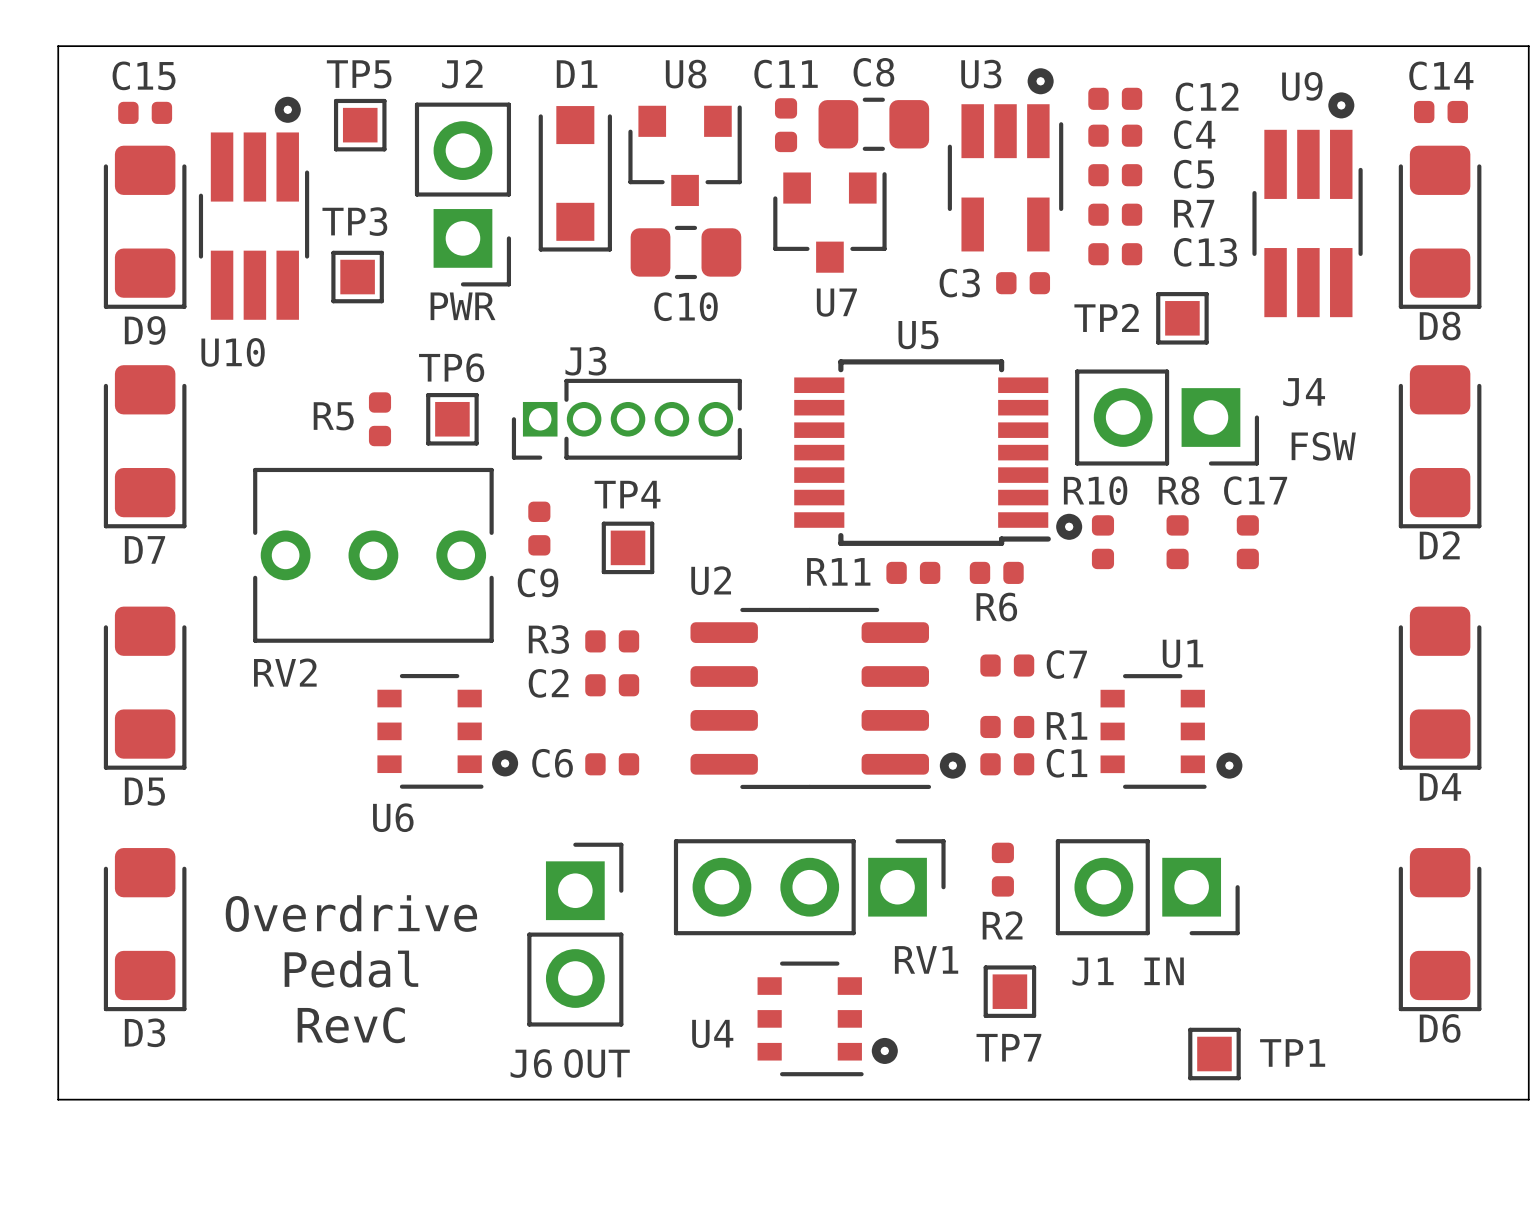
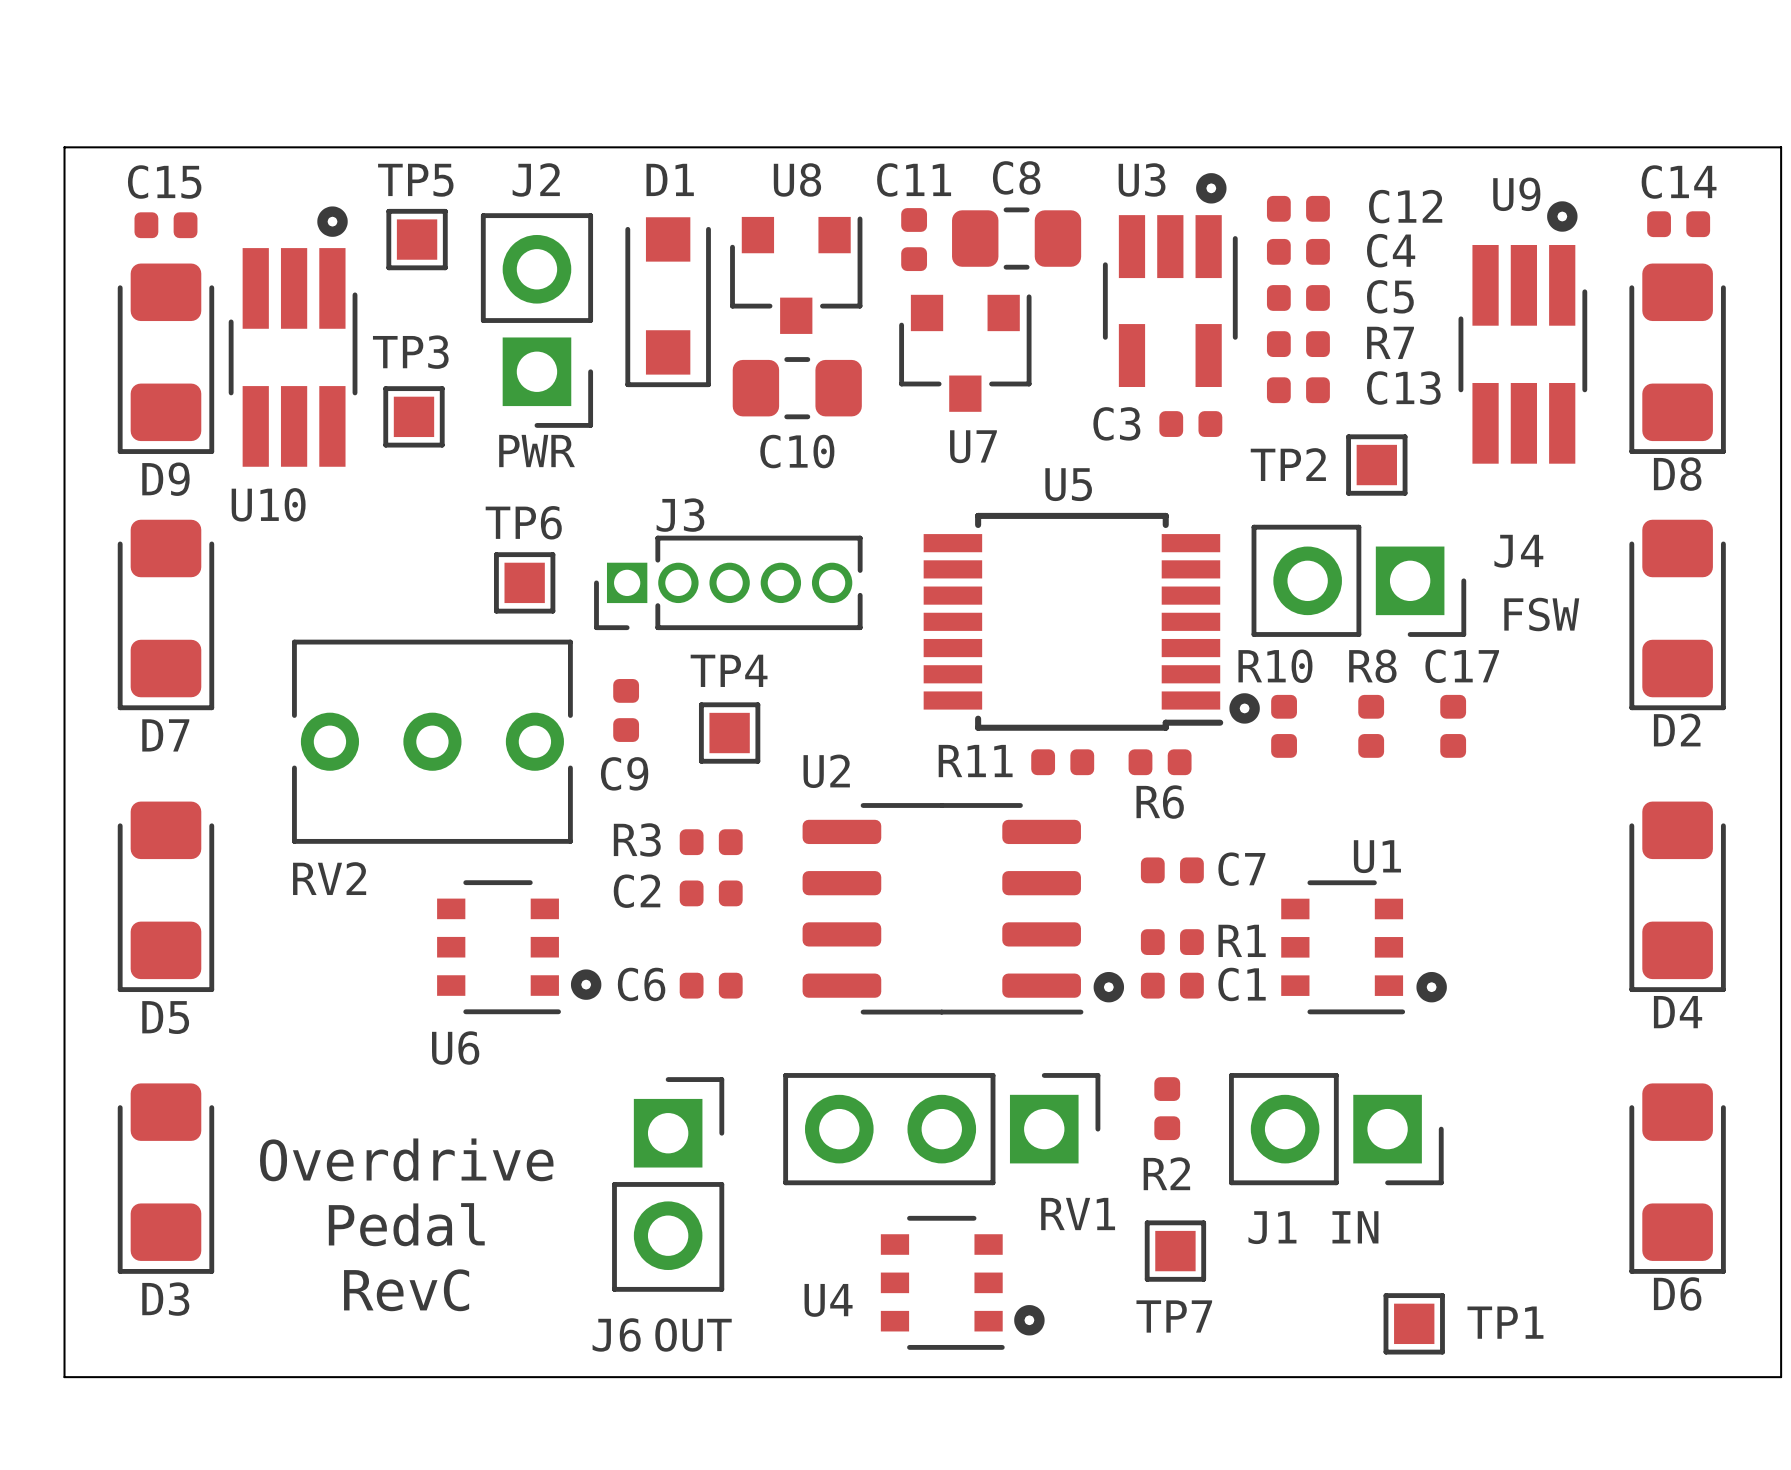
R5: (379, 419) -> none

